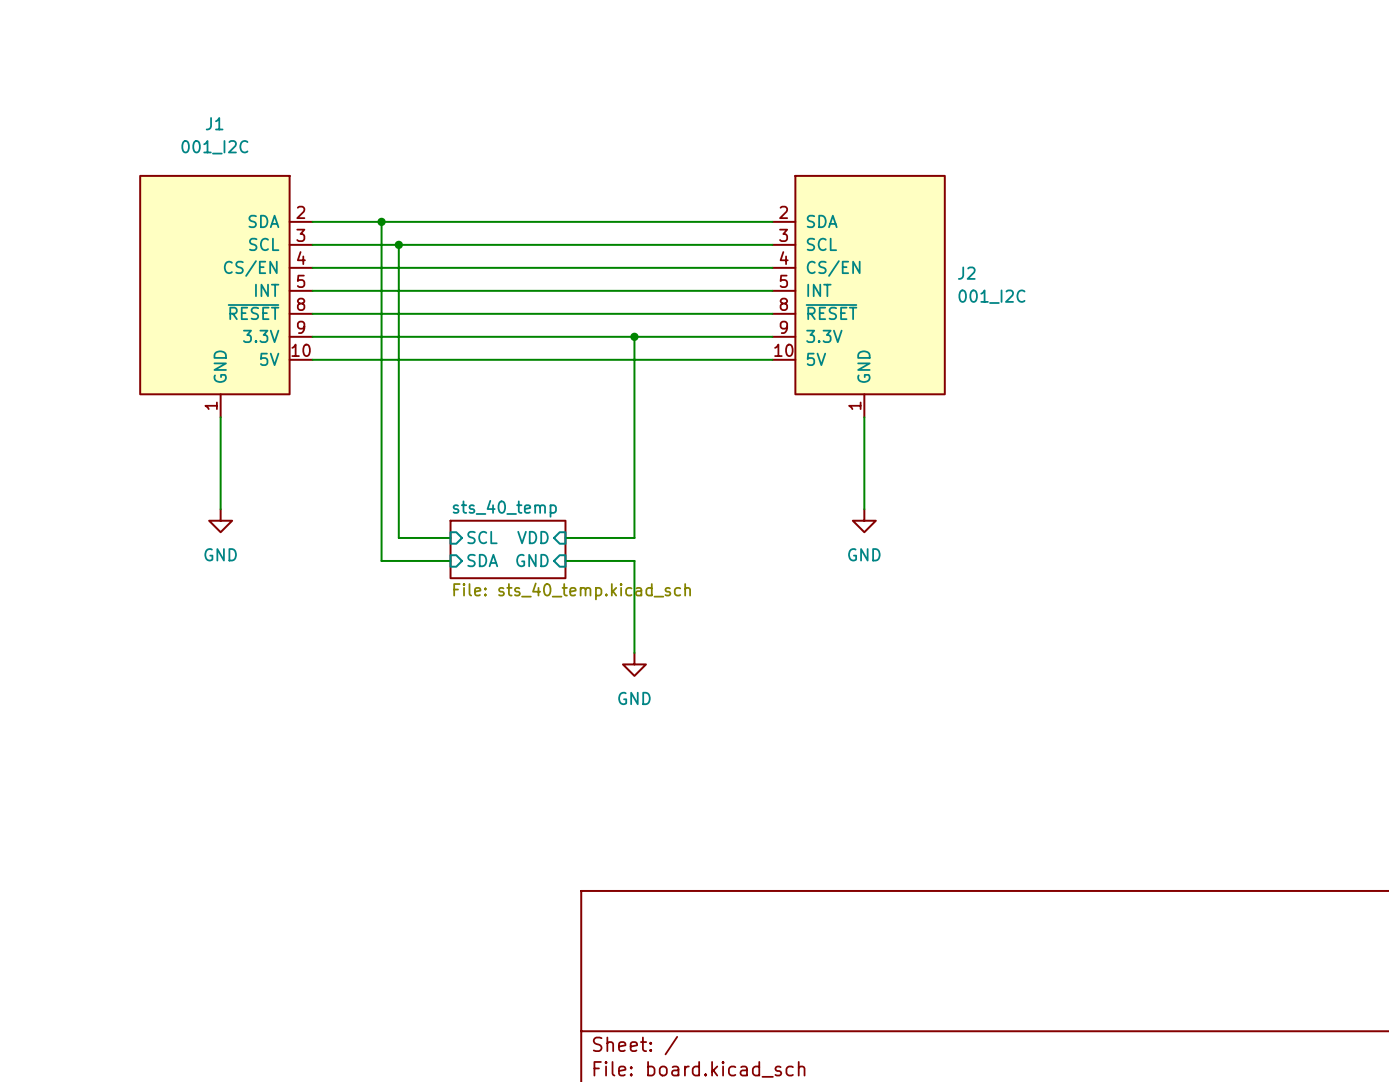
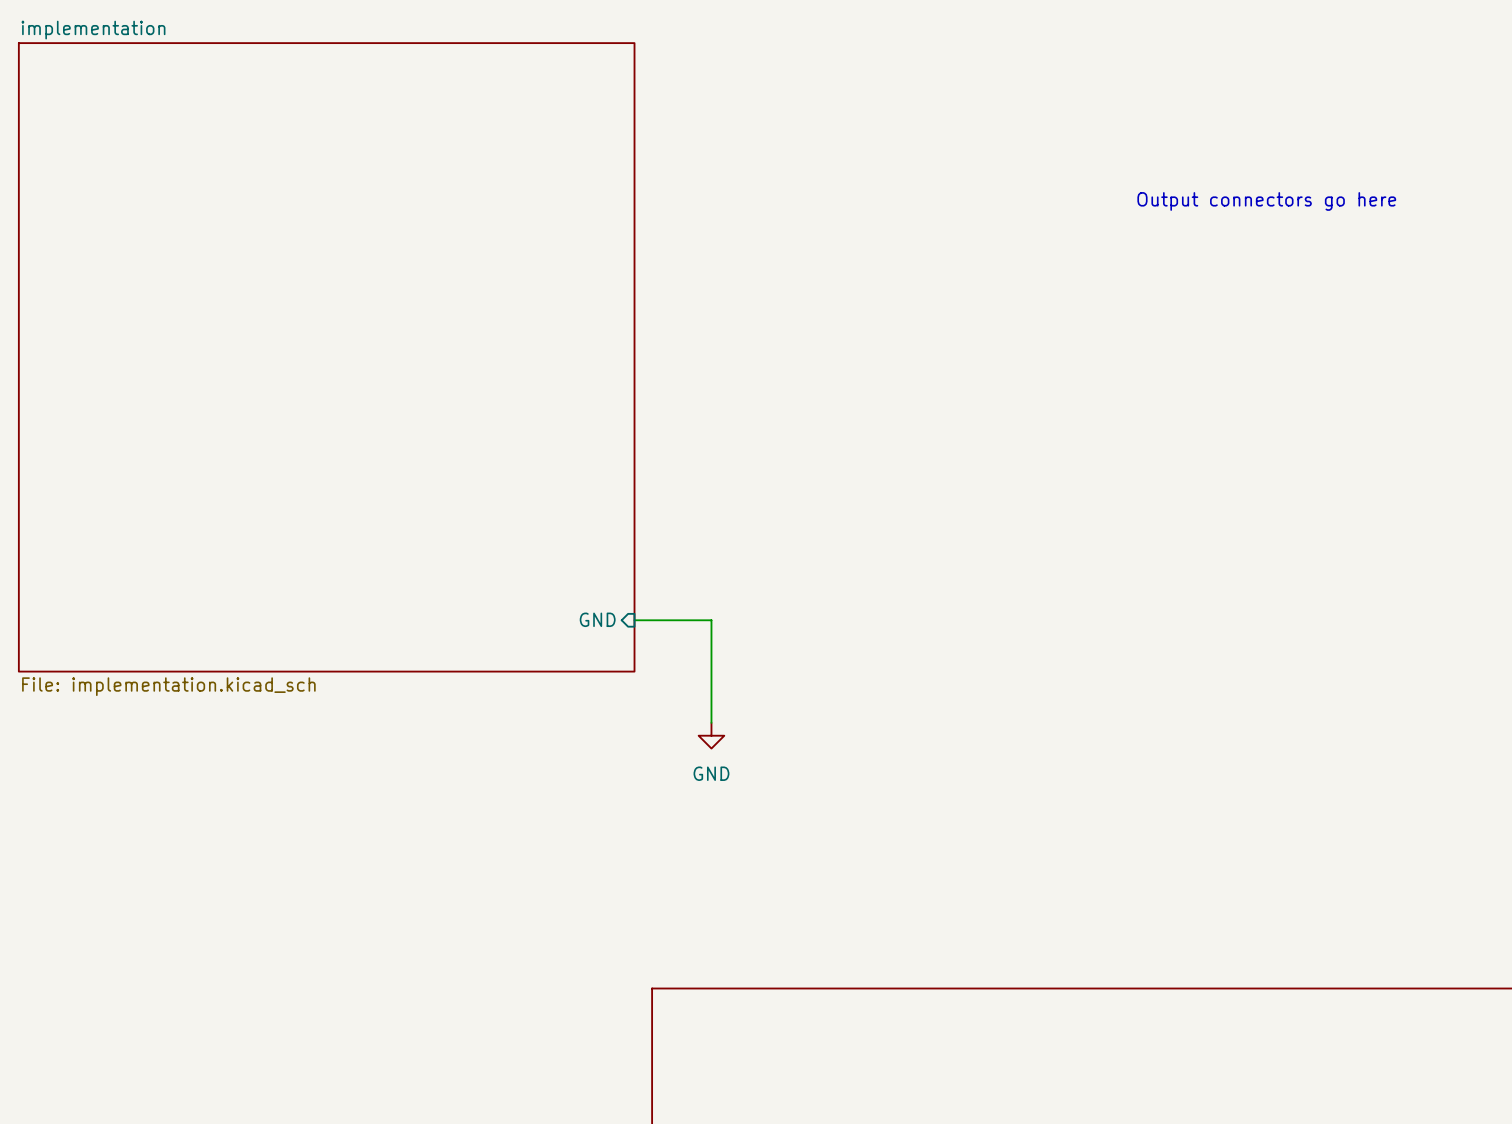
text: none -> Output connectors go here (1266, 201)
wire: (312, 221) (772, 221) -> none
wire: (381, 221) (381, 560) (450, 560) -> none
junction: (381, 221) -> none
wire: (312, 244) (772, 244) -> none
wire: (398, 244) (398, 537) (450, 537) -> none
junction: (398, 244) -> none
wire: (312, 267) (772, 267) -> none
wire: (312, 290) (772, 290) -> none
J1: 001_I2C (226, 296) -> none
J2: 001_I2C (858, 296) -> none
wire: (312, 313) (772, 313) -> none
sheet implementation: none -> File: implementation.kicad_sch (326, 357)
wire: (312, 336) (772, 336) -> none
wire: (634, 336) (634, 537) (565, 537) -> none
junction: (634, 336) -> none
wire: (312, 359) (772, 359) -> none
wire: (220, 417) (220, 509) -> none
wire: (864, 417) (864, 509) -> none
power symbol: GND (220, 520) -> none
power symbol: GND (864, 520) -> none
sheet pin: SCL (482, 537) -> none
sheet pin: VDD (533, 537) -> none
sheet sts_40_temp: File: sts_40_temp.kicad_sch (508, 549) -> none
sheet pin: SDA (482, 560) -> none

